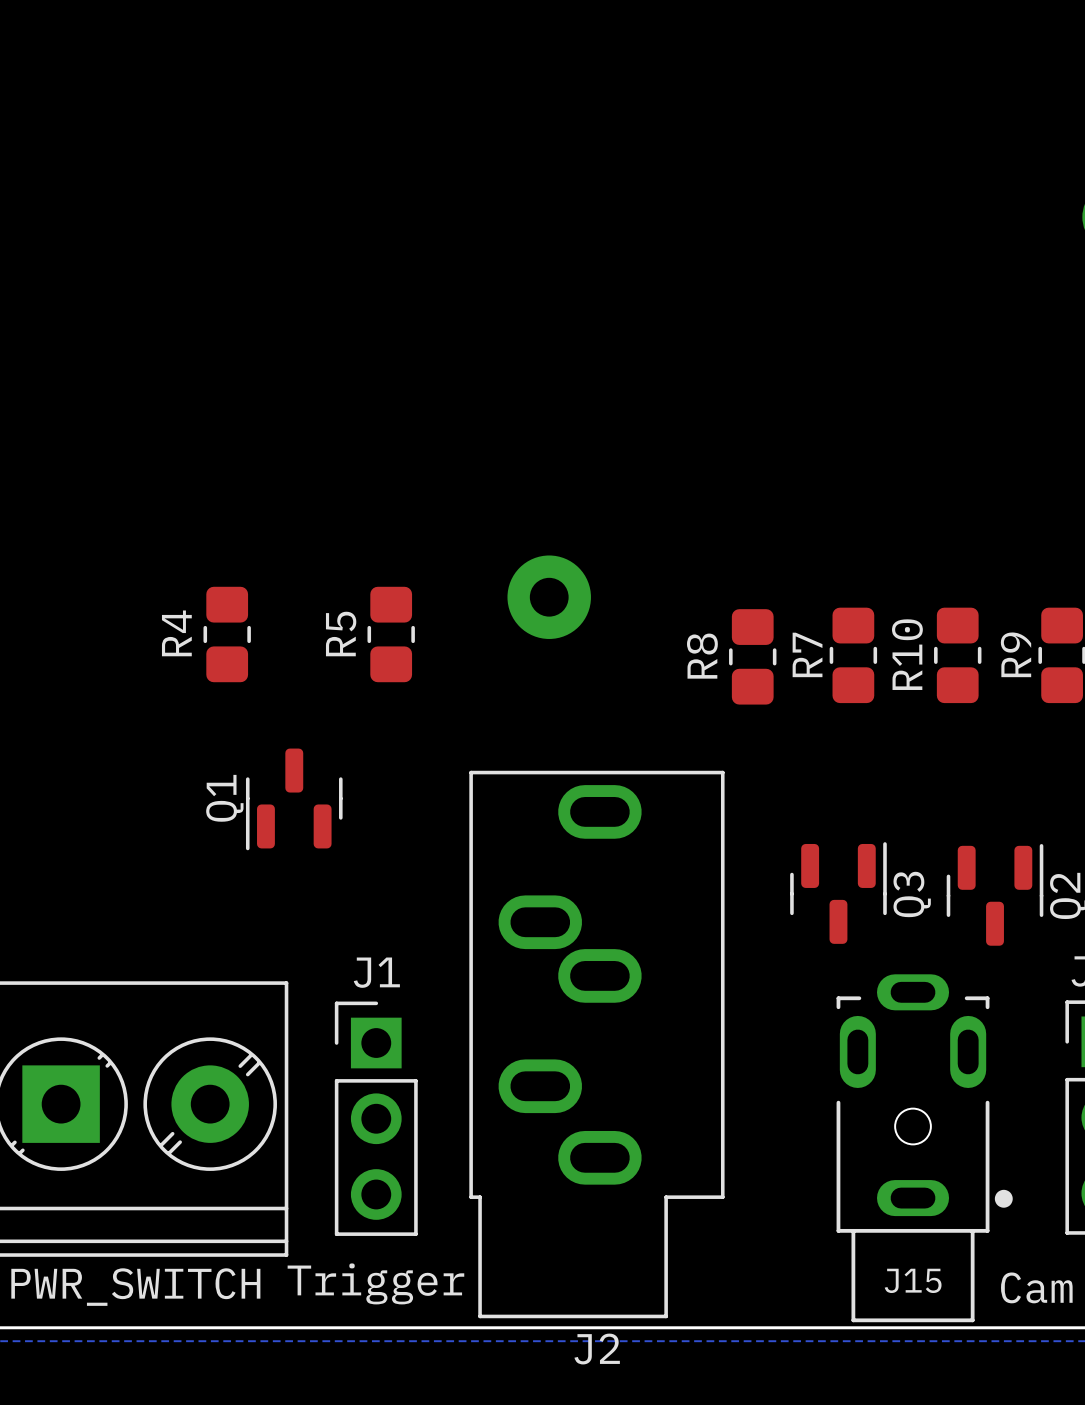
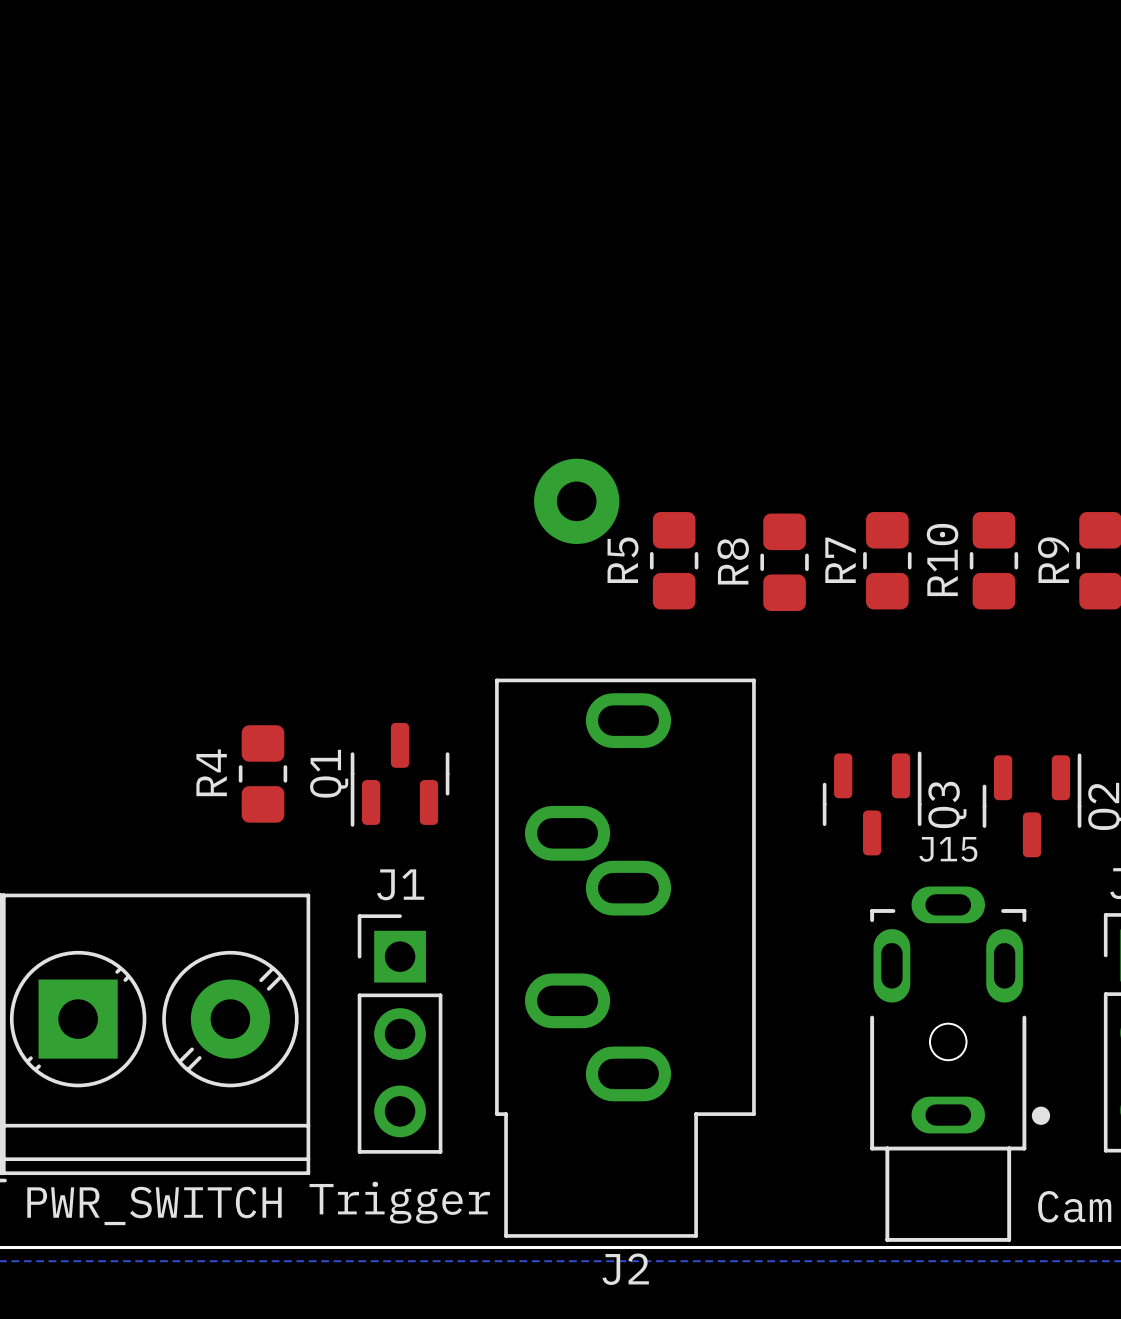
R4 position: (227, 634) -> (263, 773)
R5 position: (391, 634) -> (674, 560)
Q1 position: (294, 799) -> (400, 774)
J15 name position: J15 (913, 1280) -> J15 (948, 849)

